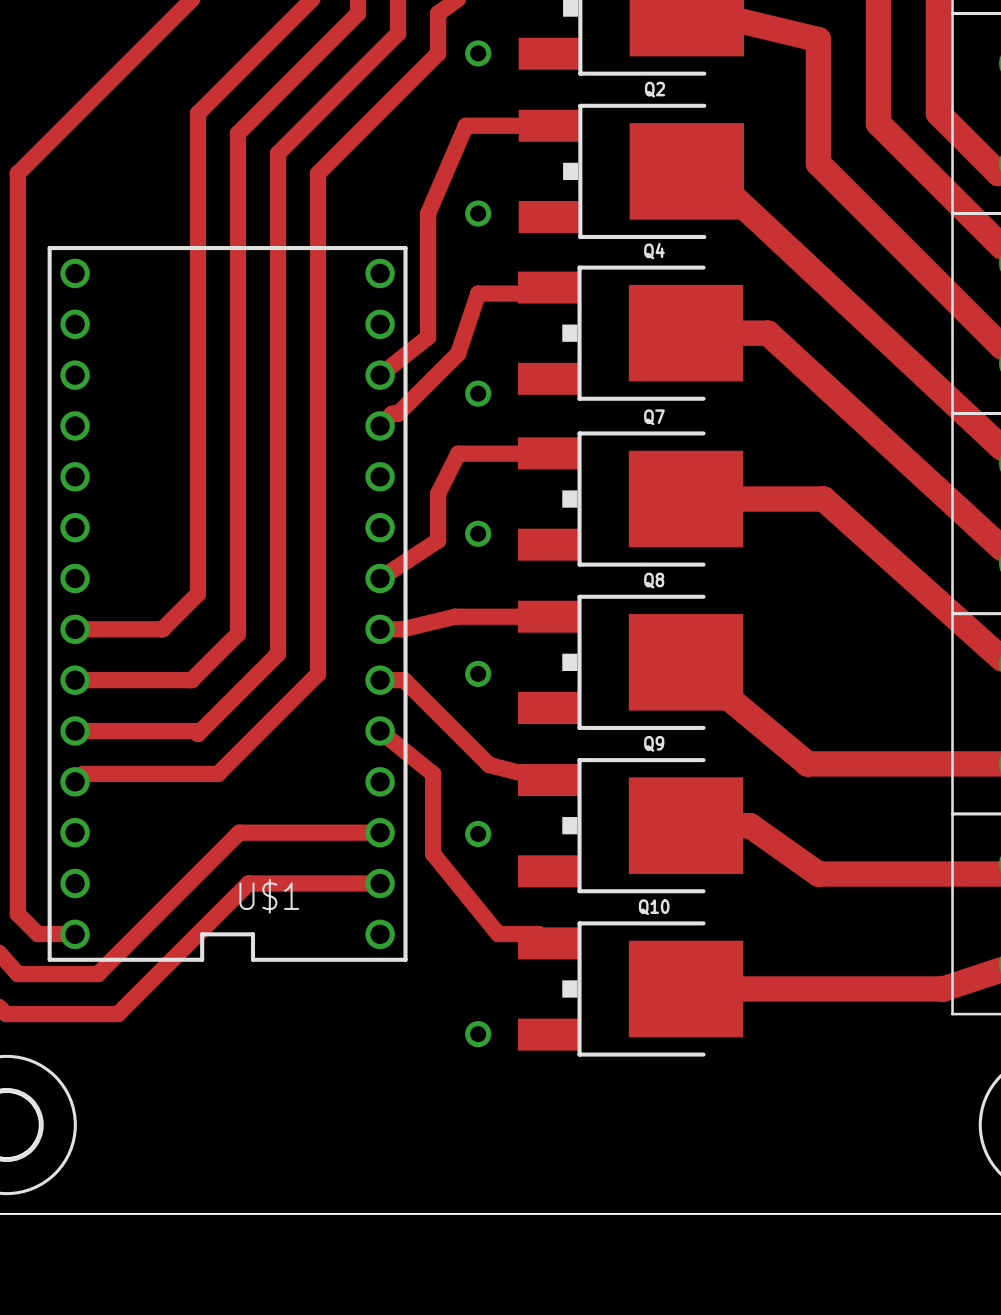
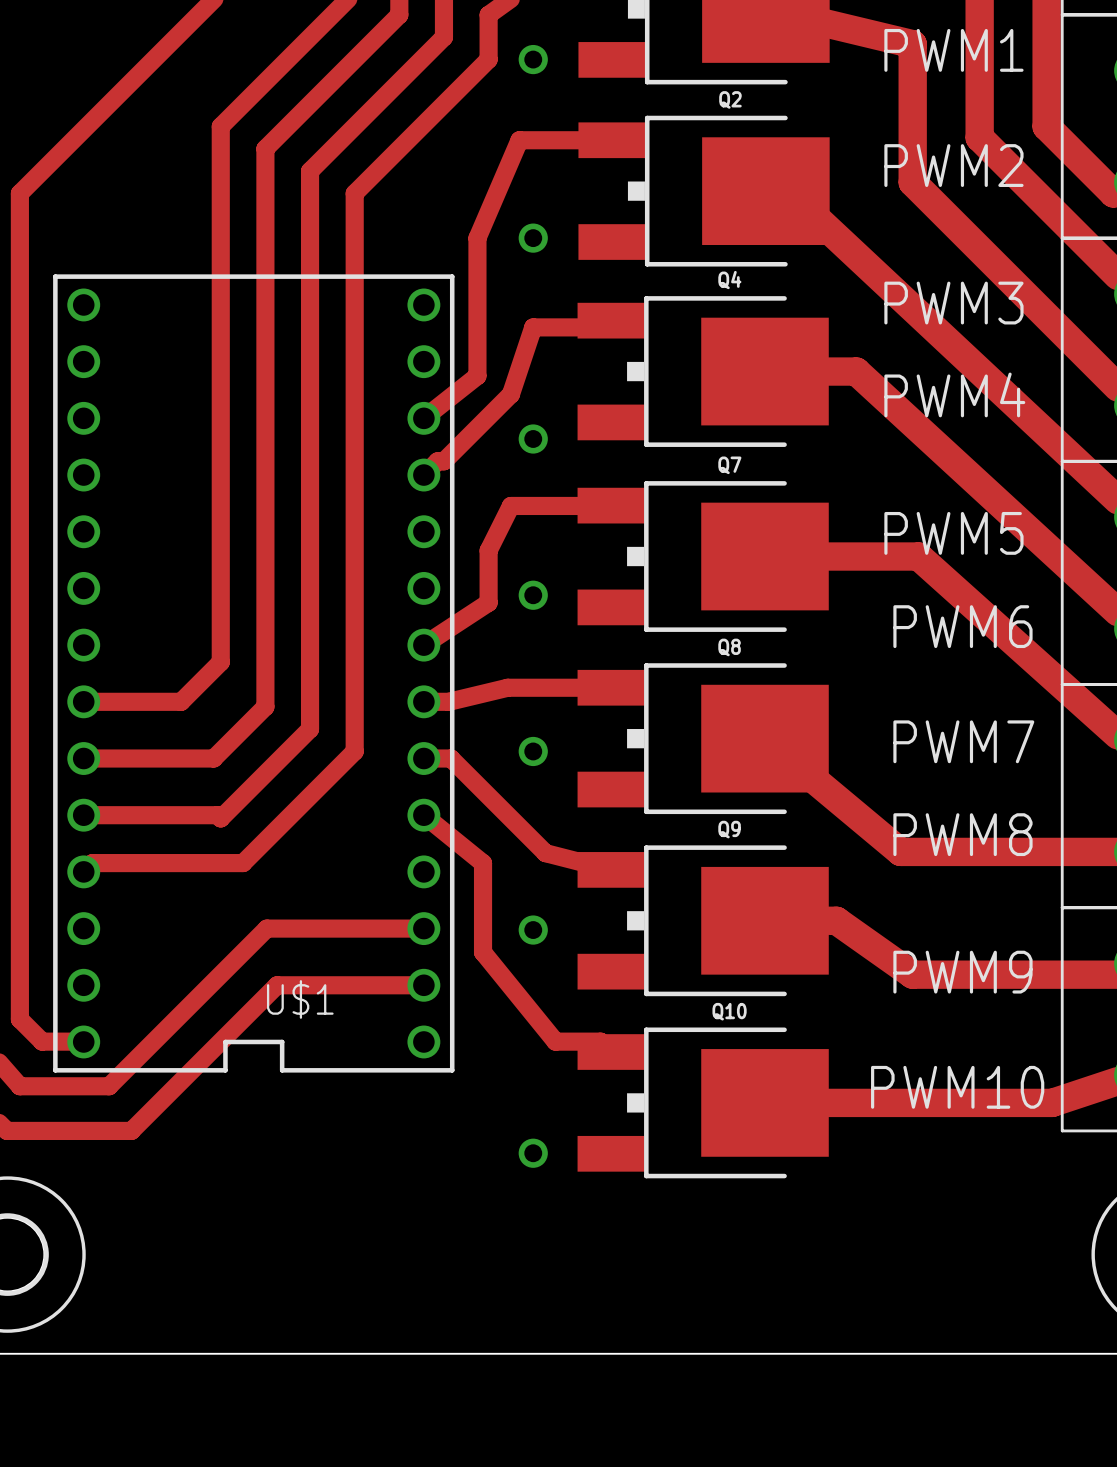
text: none -> PWM1 (953, 50)
text: none -> PWM2 (953, 165)
text: none -> PWM3 (953, 303)
text: none -> PWM4 (954, 394)
text: none -> PWM5 (953, 533)
text: none -> PWM6 (962, 626)
text: none -> PWM7 (963, 741)
text: none -> PWM8 (962, 834)
text: none -> PWM9 (962, 972)
text: none -> PWM10 (957, 1087)

